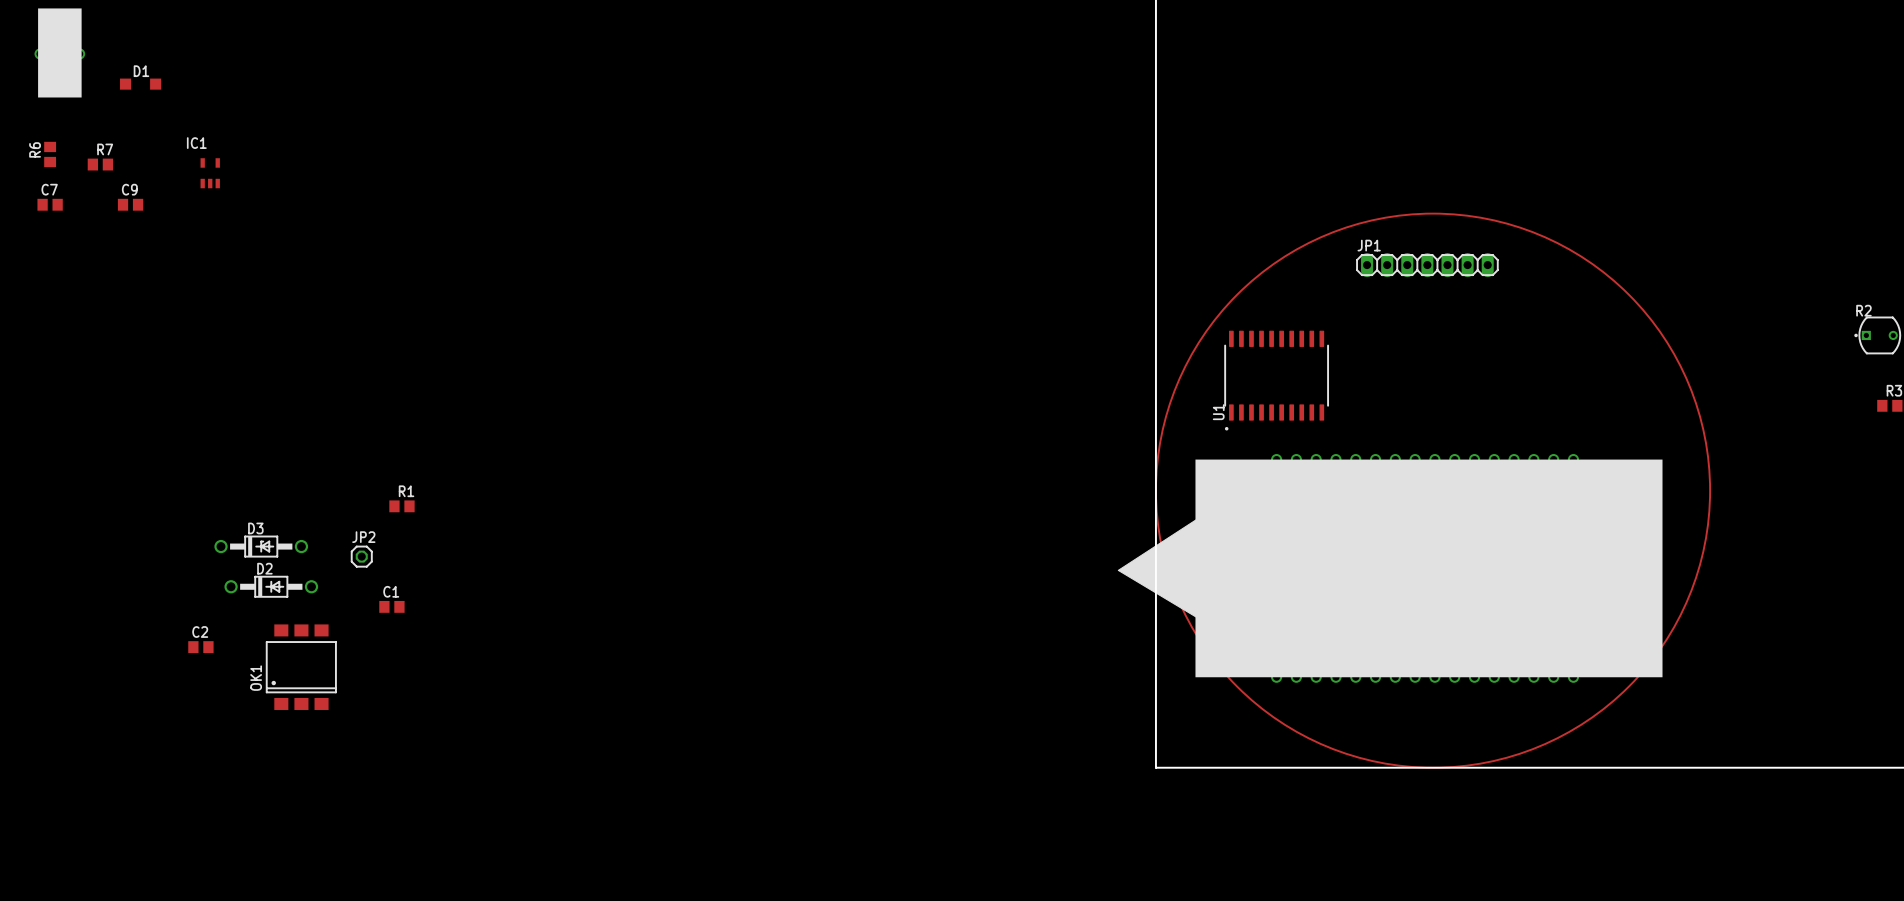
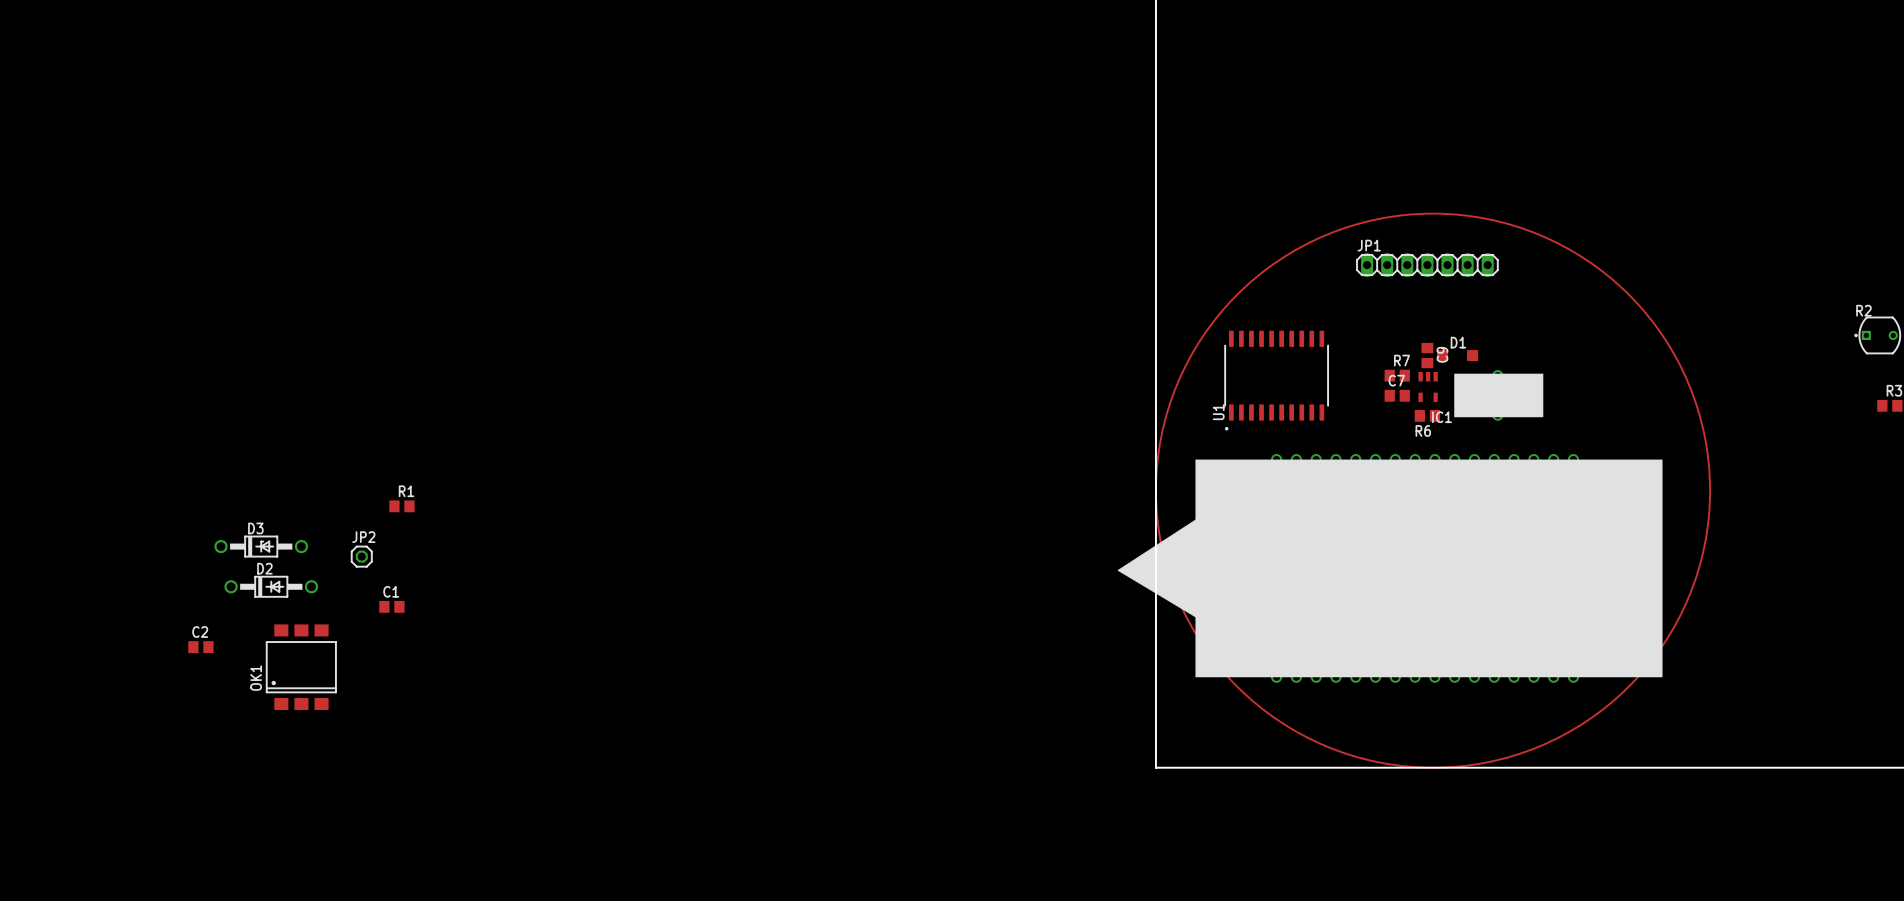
part: (59, 52) -> none
D1 position: (140, 84) -> (1457, 355)
R6 name position: R6 (35, 149) -> R6 (1423, 430)
R6 rotation: 0° (50, 154) -> 90° clockwise (1427, 415)
R6 position: (50, 154) -> (1427, 415)
R7 position: (100, 164) -> (1397, 375)
IC1 rotation: 0° (210, 173) -> 180° (1428, 387)
IC1 position: (210, 173) -> (1428, 387)
C7 position: (50, 204) -> (1397, 395)
C9 rotation: 0° (130, 204) -> 90° clockwise (1427, 355)
C9 position: (130, 204) -> (1427, 355)
part: none -> (1498, 395)

